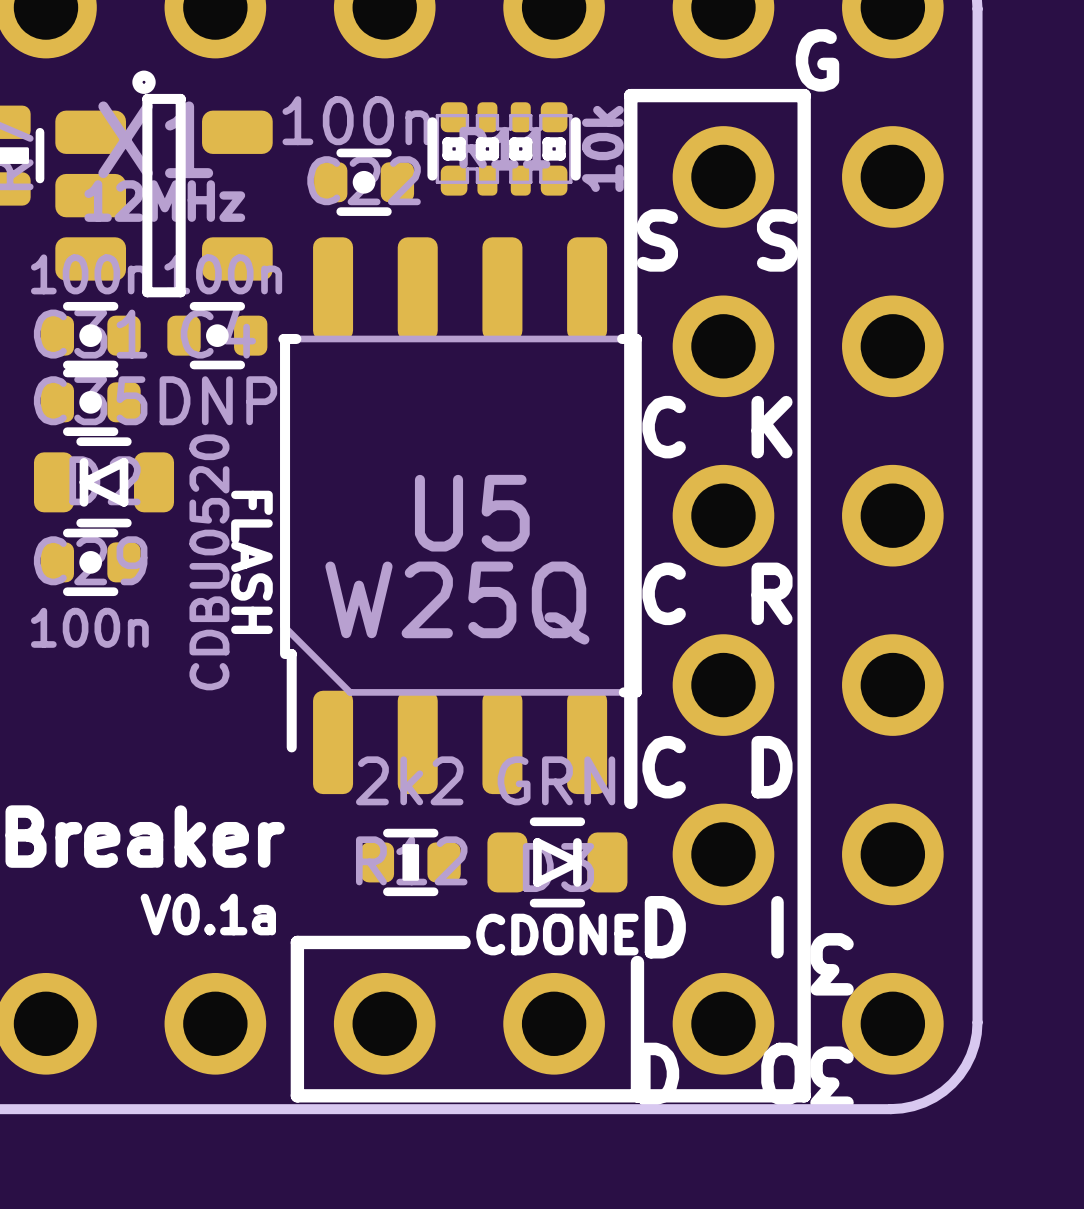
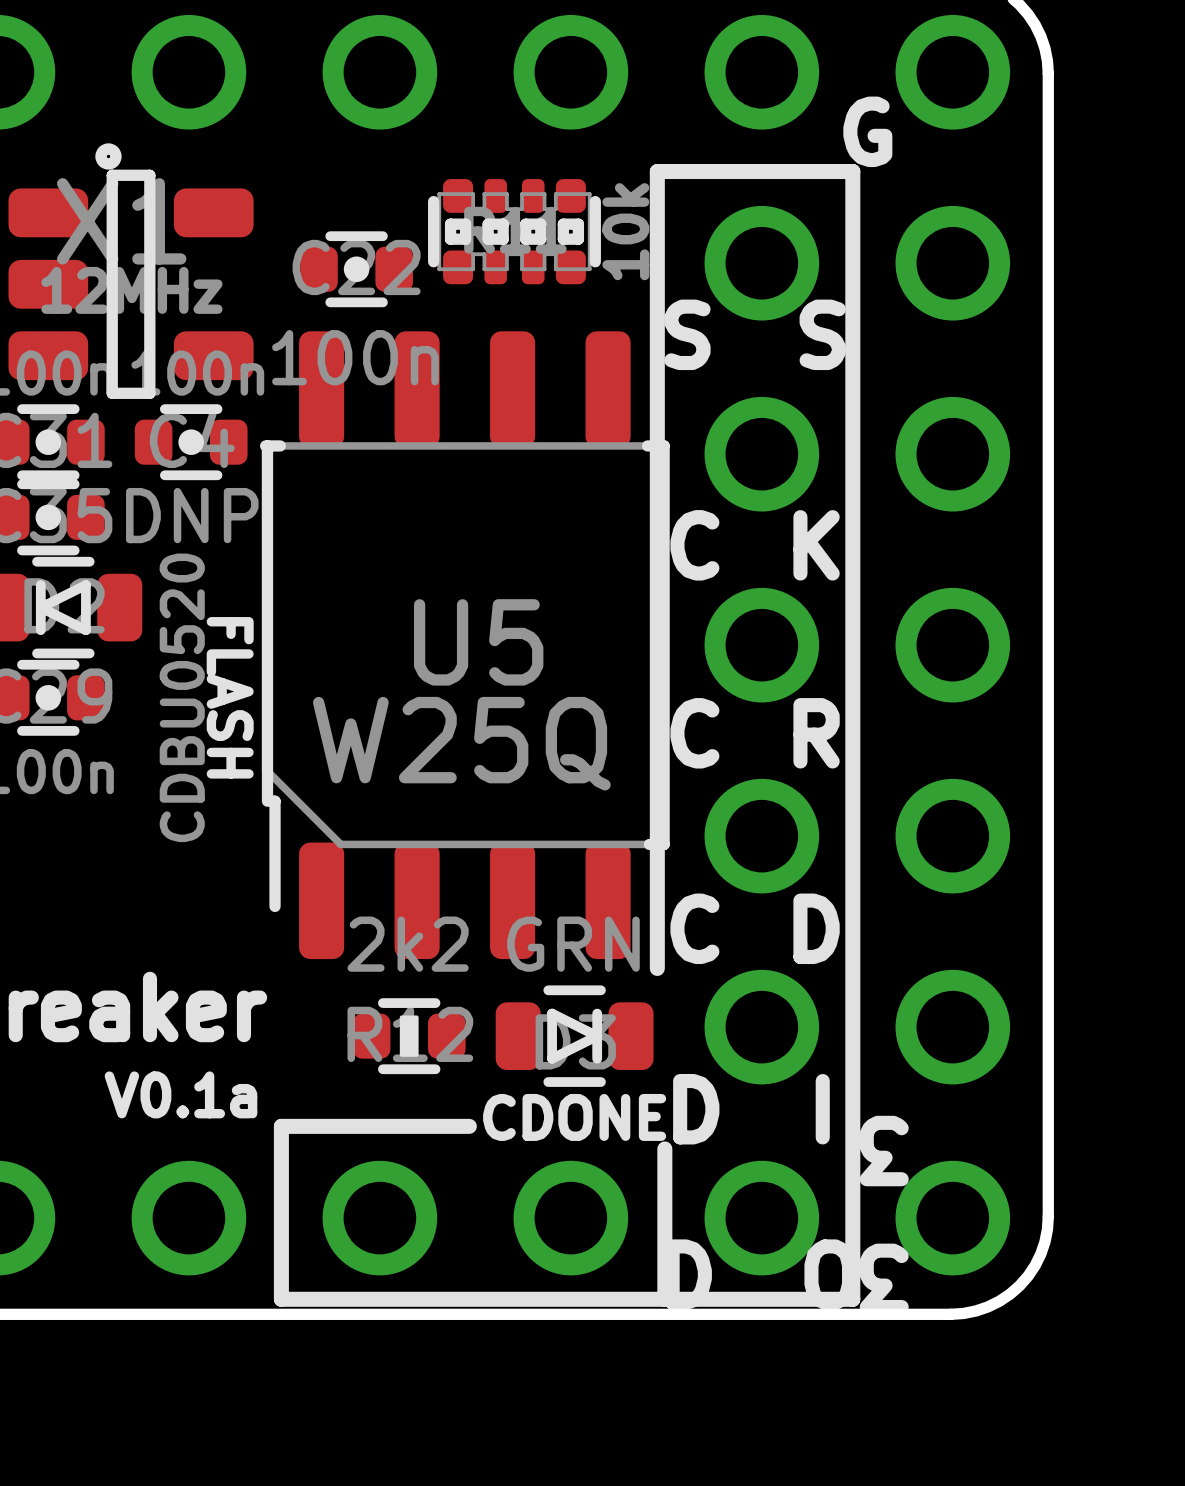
C22 value position: 100n (356, 120) -> 100n (355, 357)

